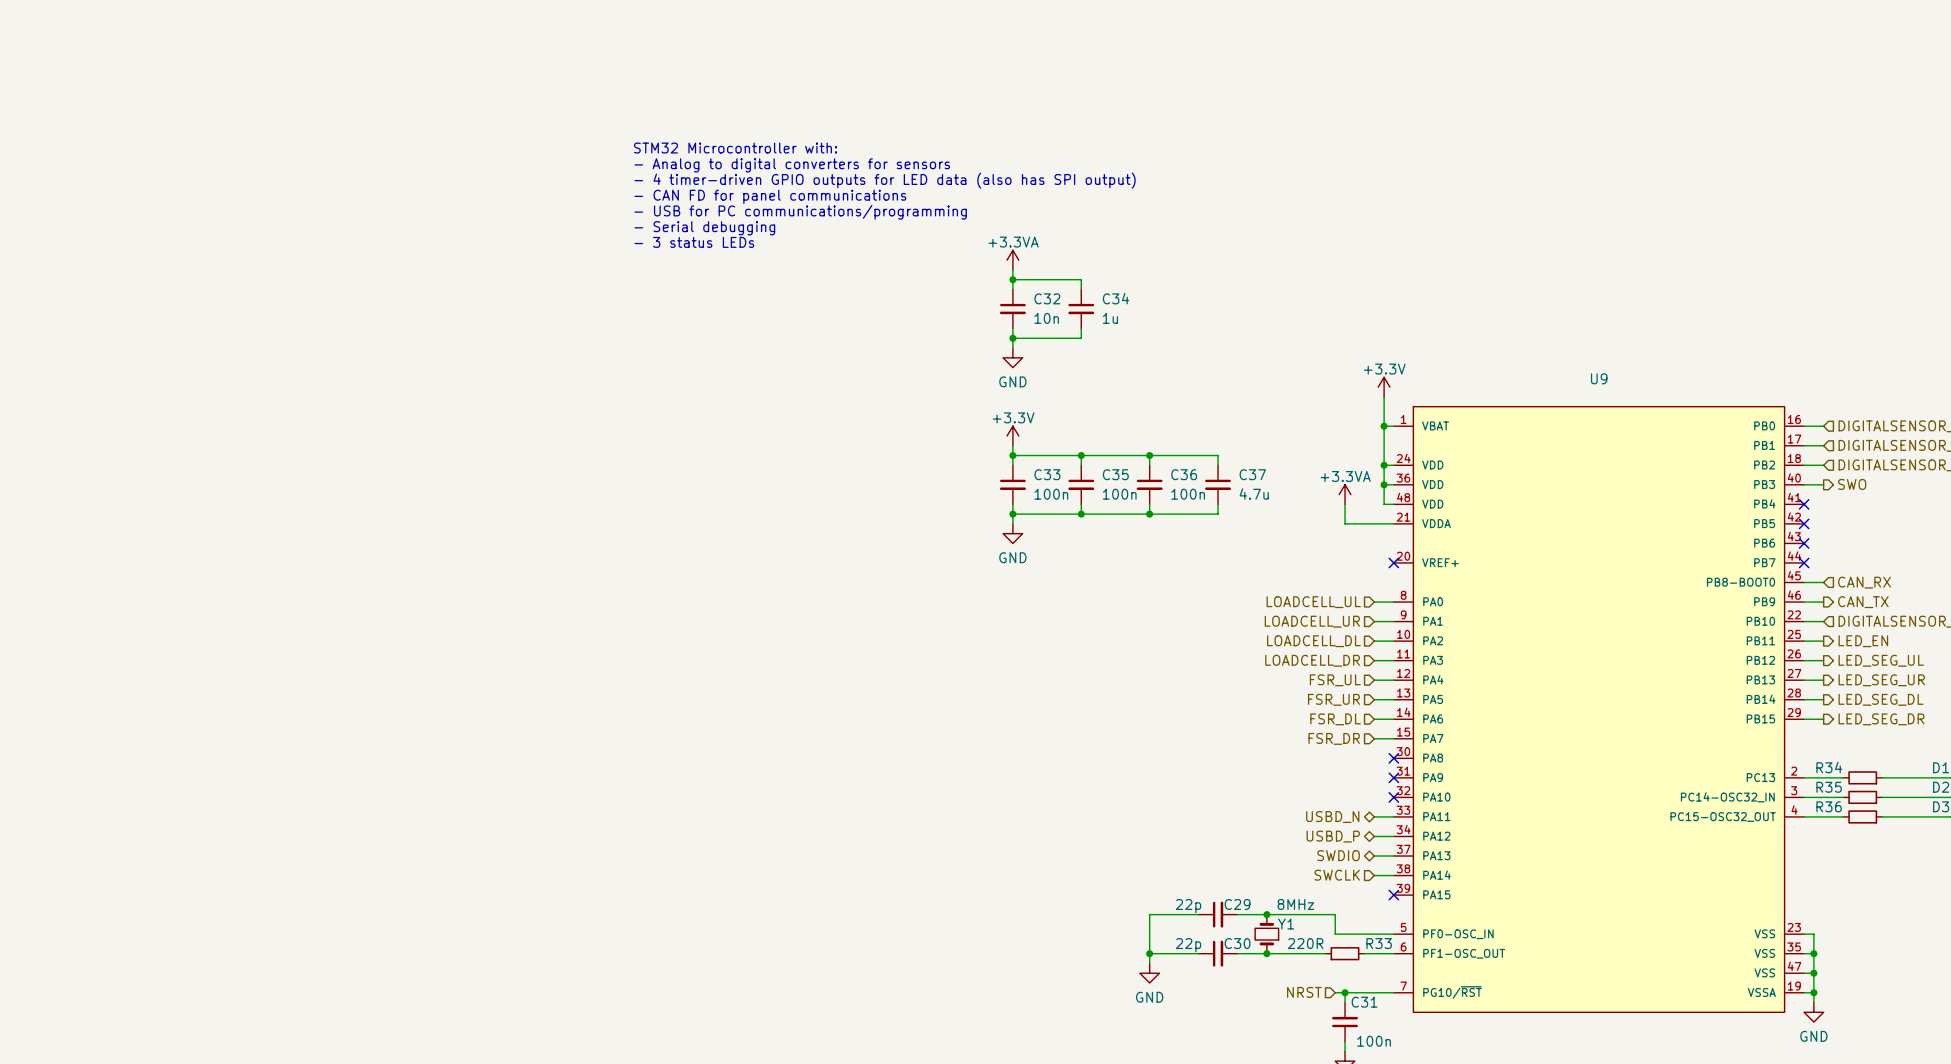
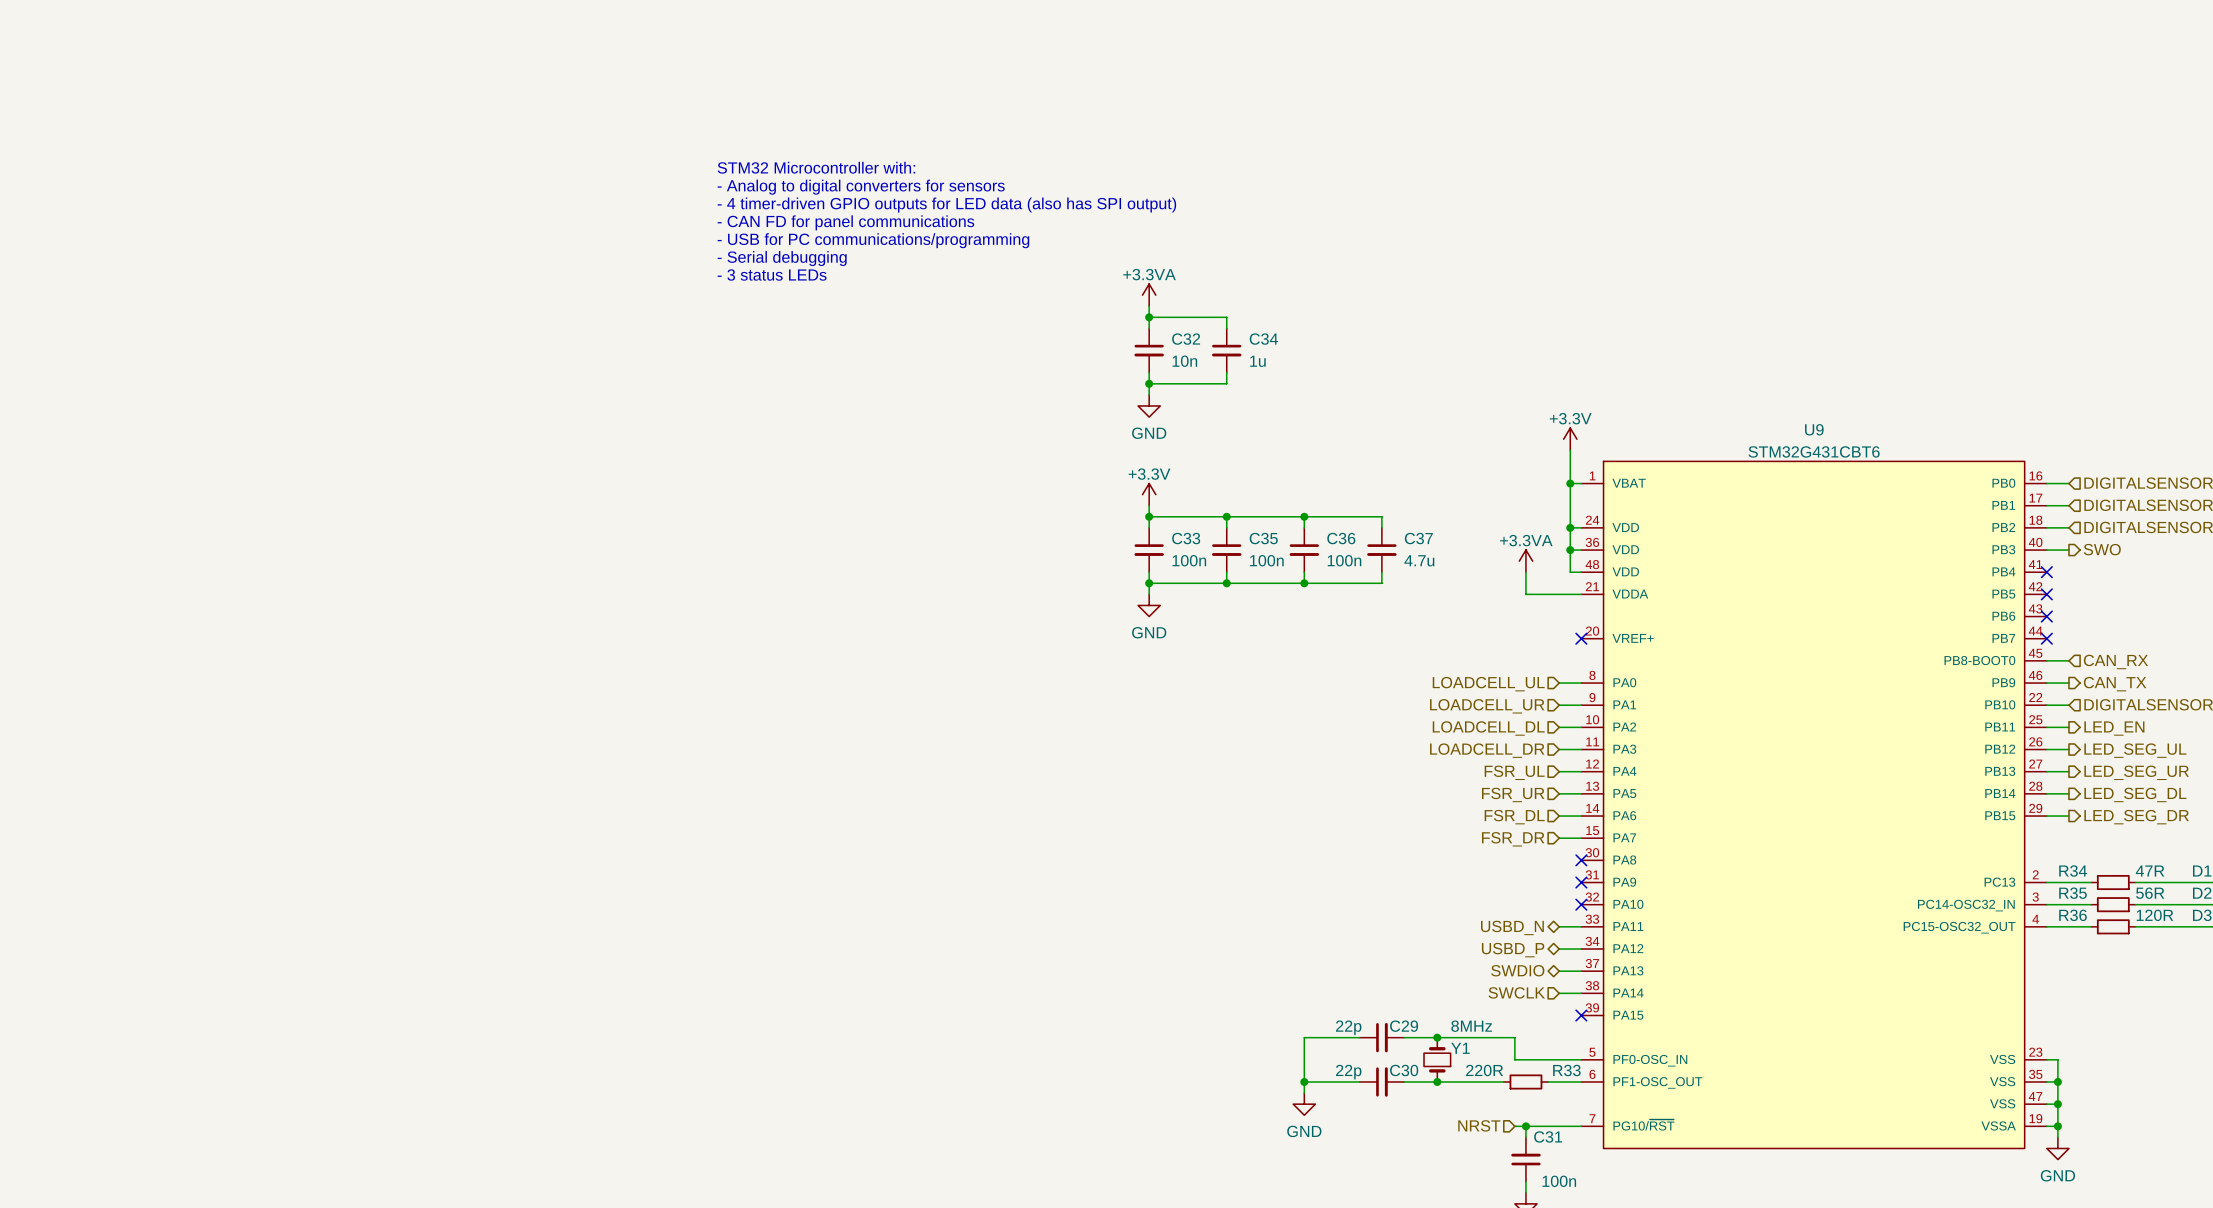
U9 value: none -> STM32G431CBT6 (1814, 451)
R34 value: none -> 47R (2150, 871)
R35 value: none -> 56R (2150, 893)
R36 value: none -> 120R (2154, 915)

